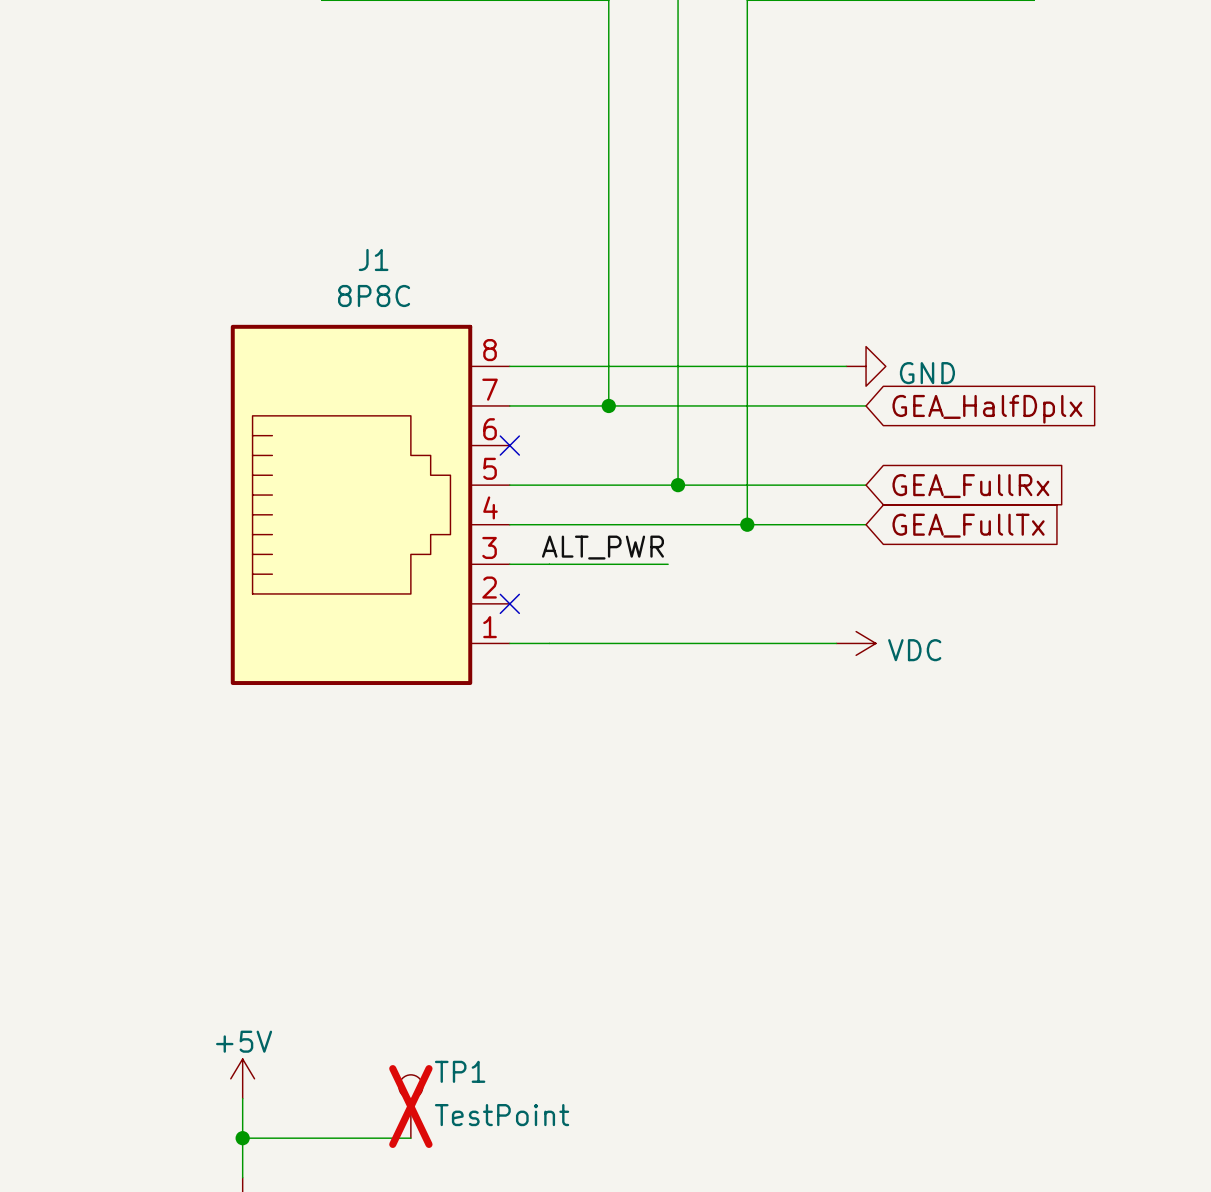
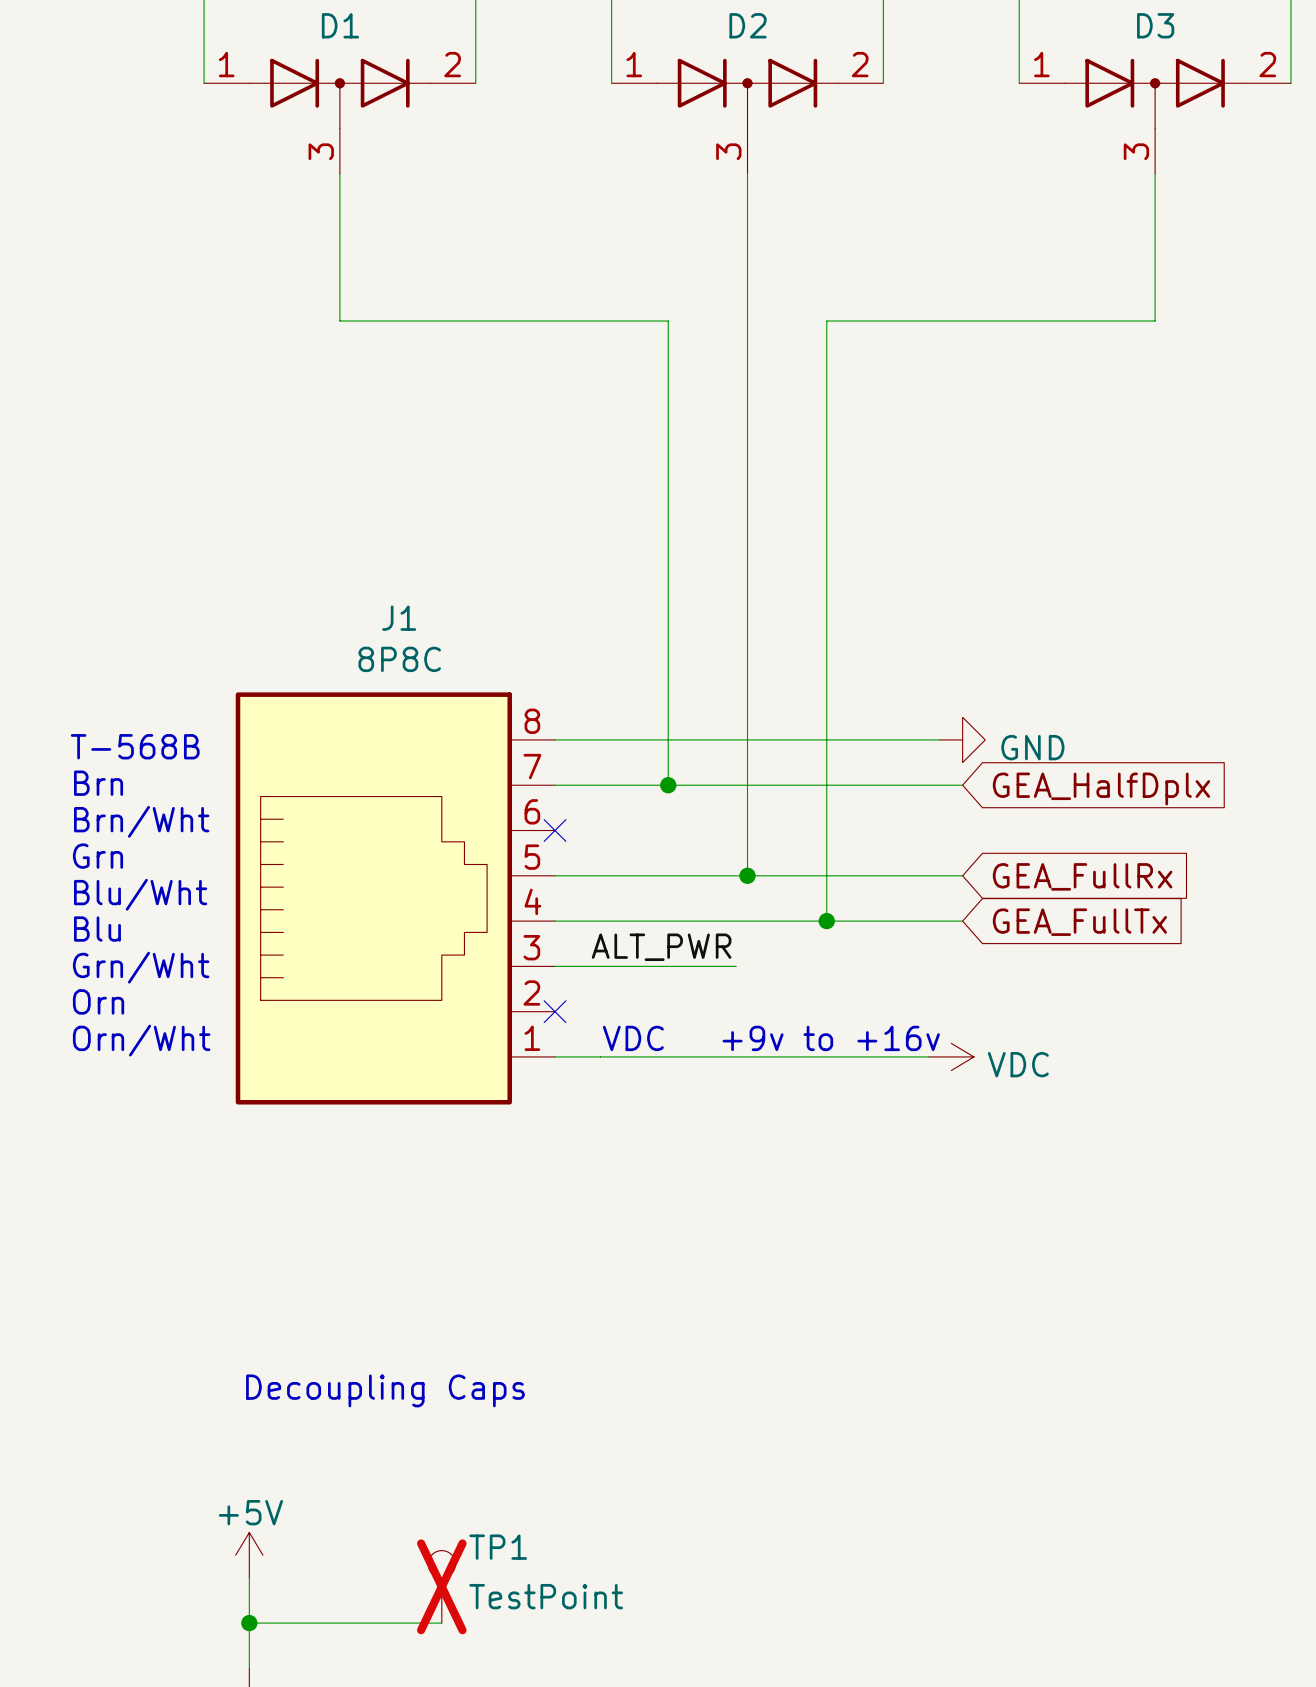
text: none -> T-568B (135, 746)
text: none -> Brn (98, 783)
text: none -> Brn/Wht (141, 821)
text: none -> Grn (97, 856)
text: none -> Blu/Wht (140, 894)
text: none -> Blu (97, 929)
text: none -> Grn/Wht (141, 967)
text: none -> Orn (98, 1001)
text: none -> VDC +9v to +16v (771, 1038)
text: none -> Orn/Wht (141, 1040)
text: none -> Decoupling Caps (385, 1390)

